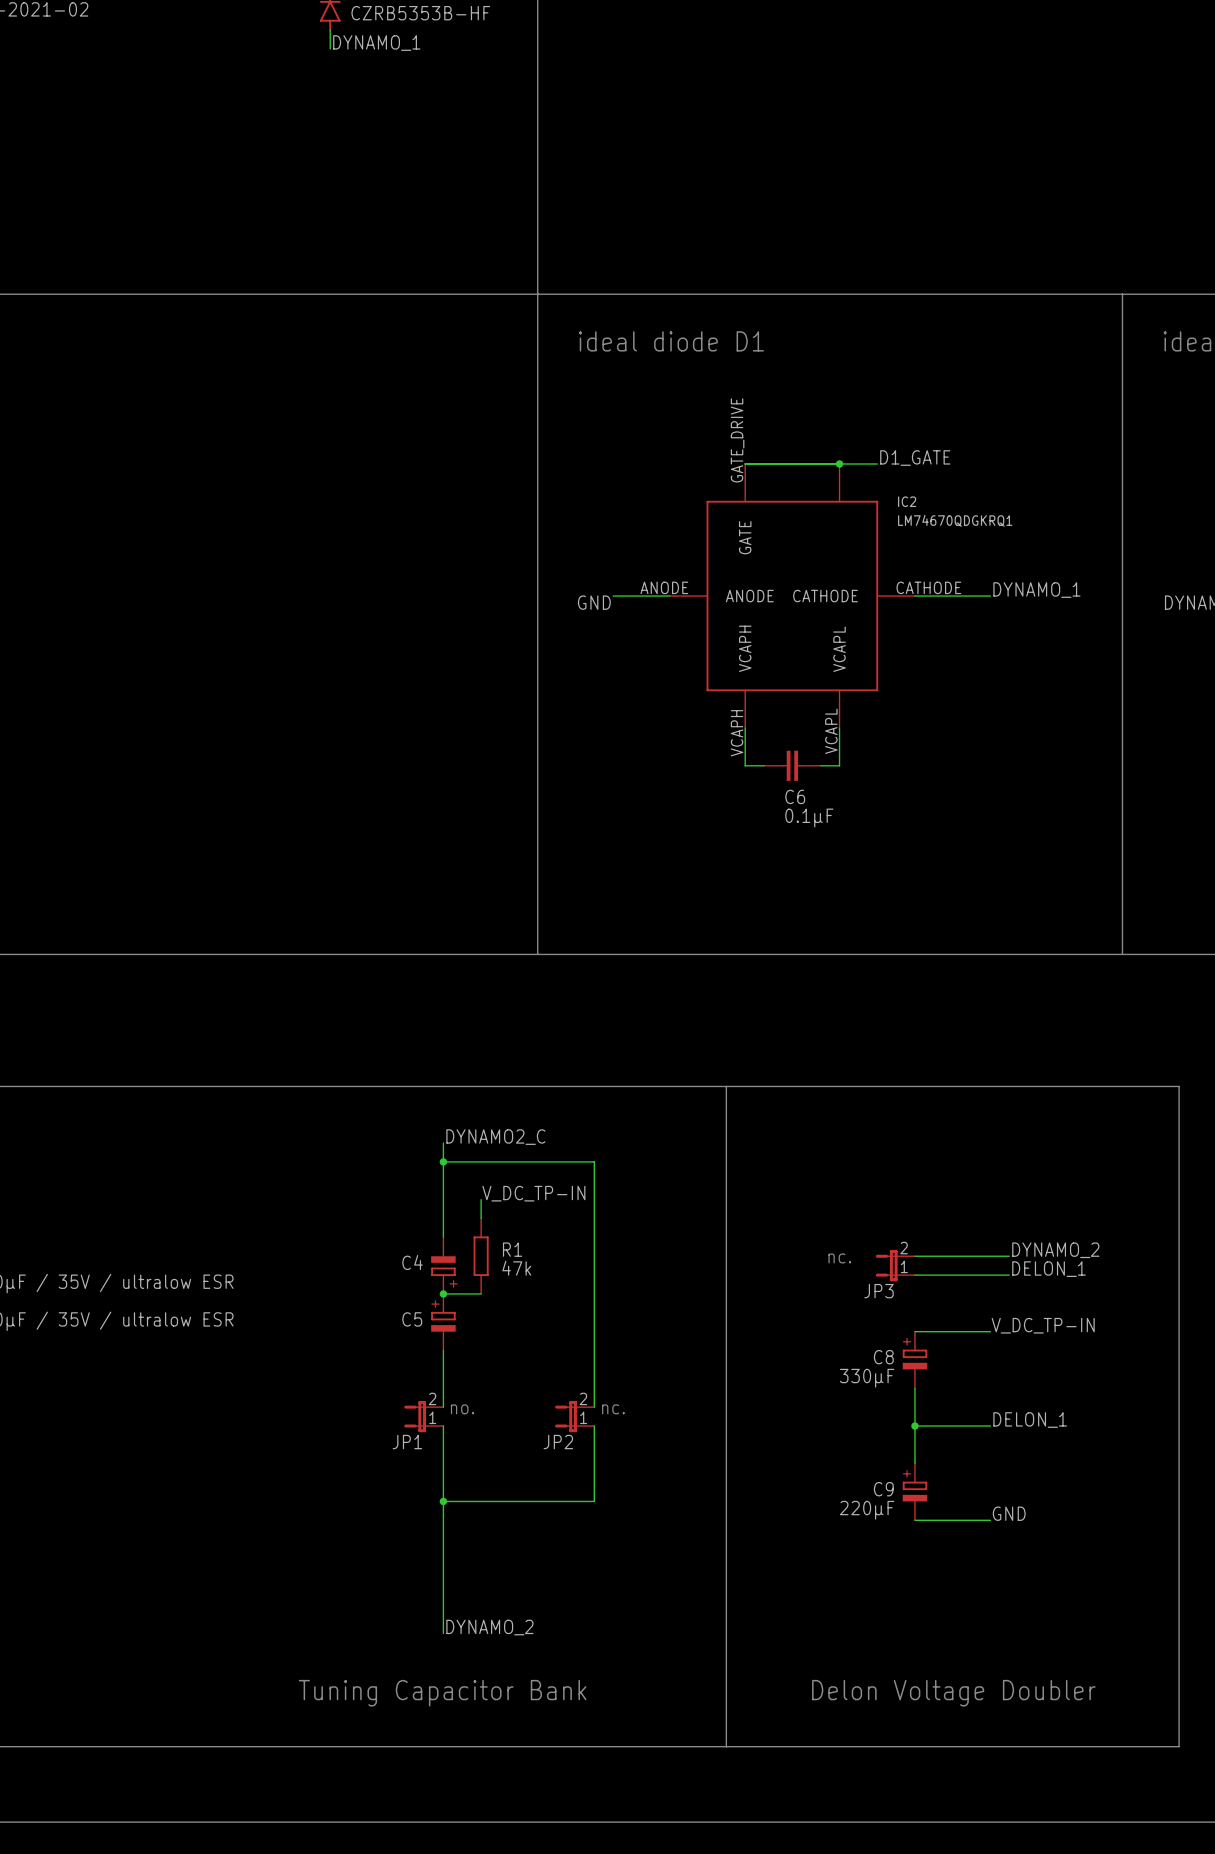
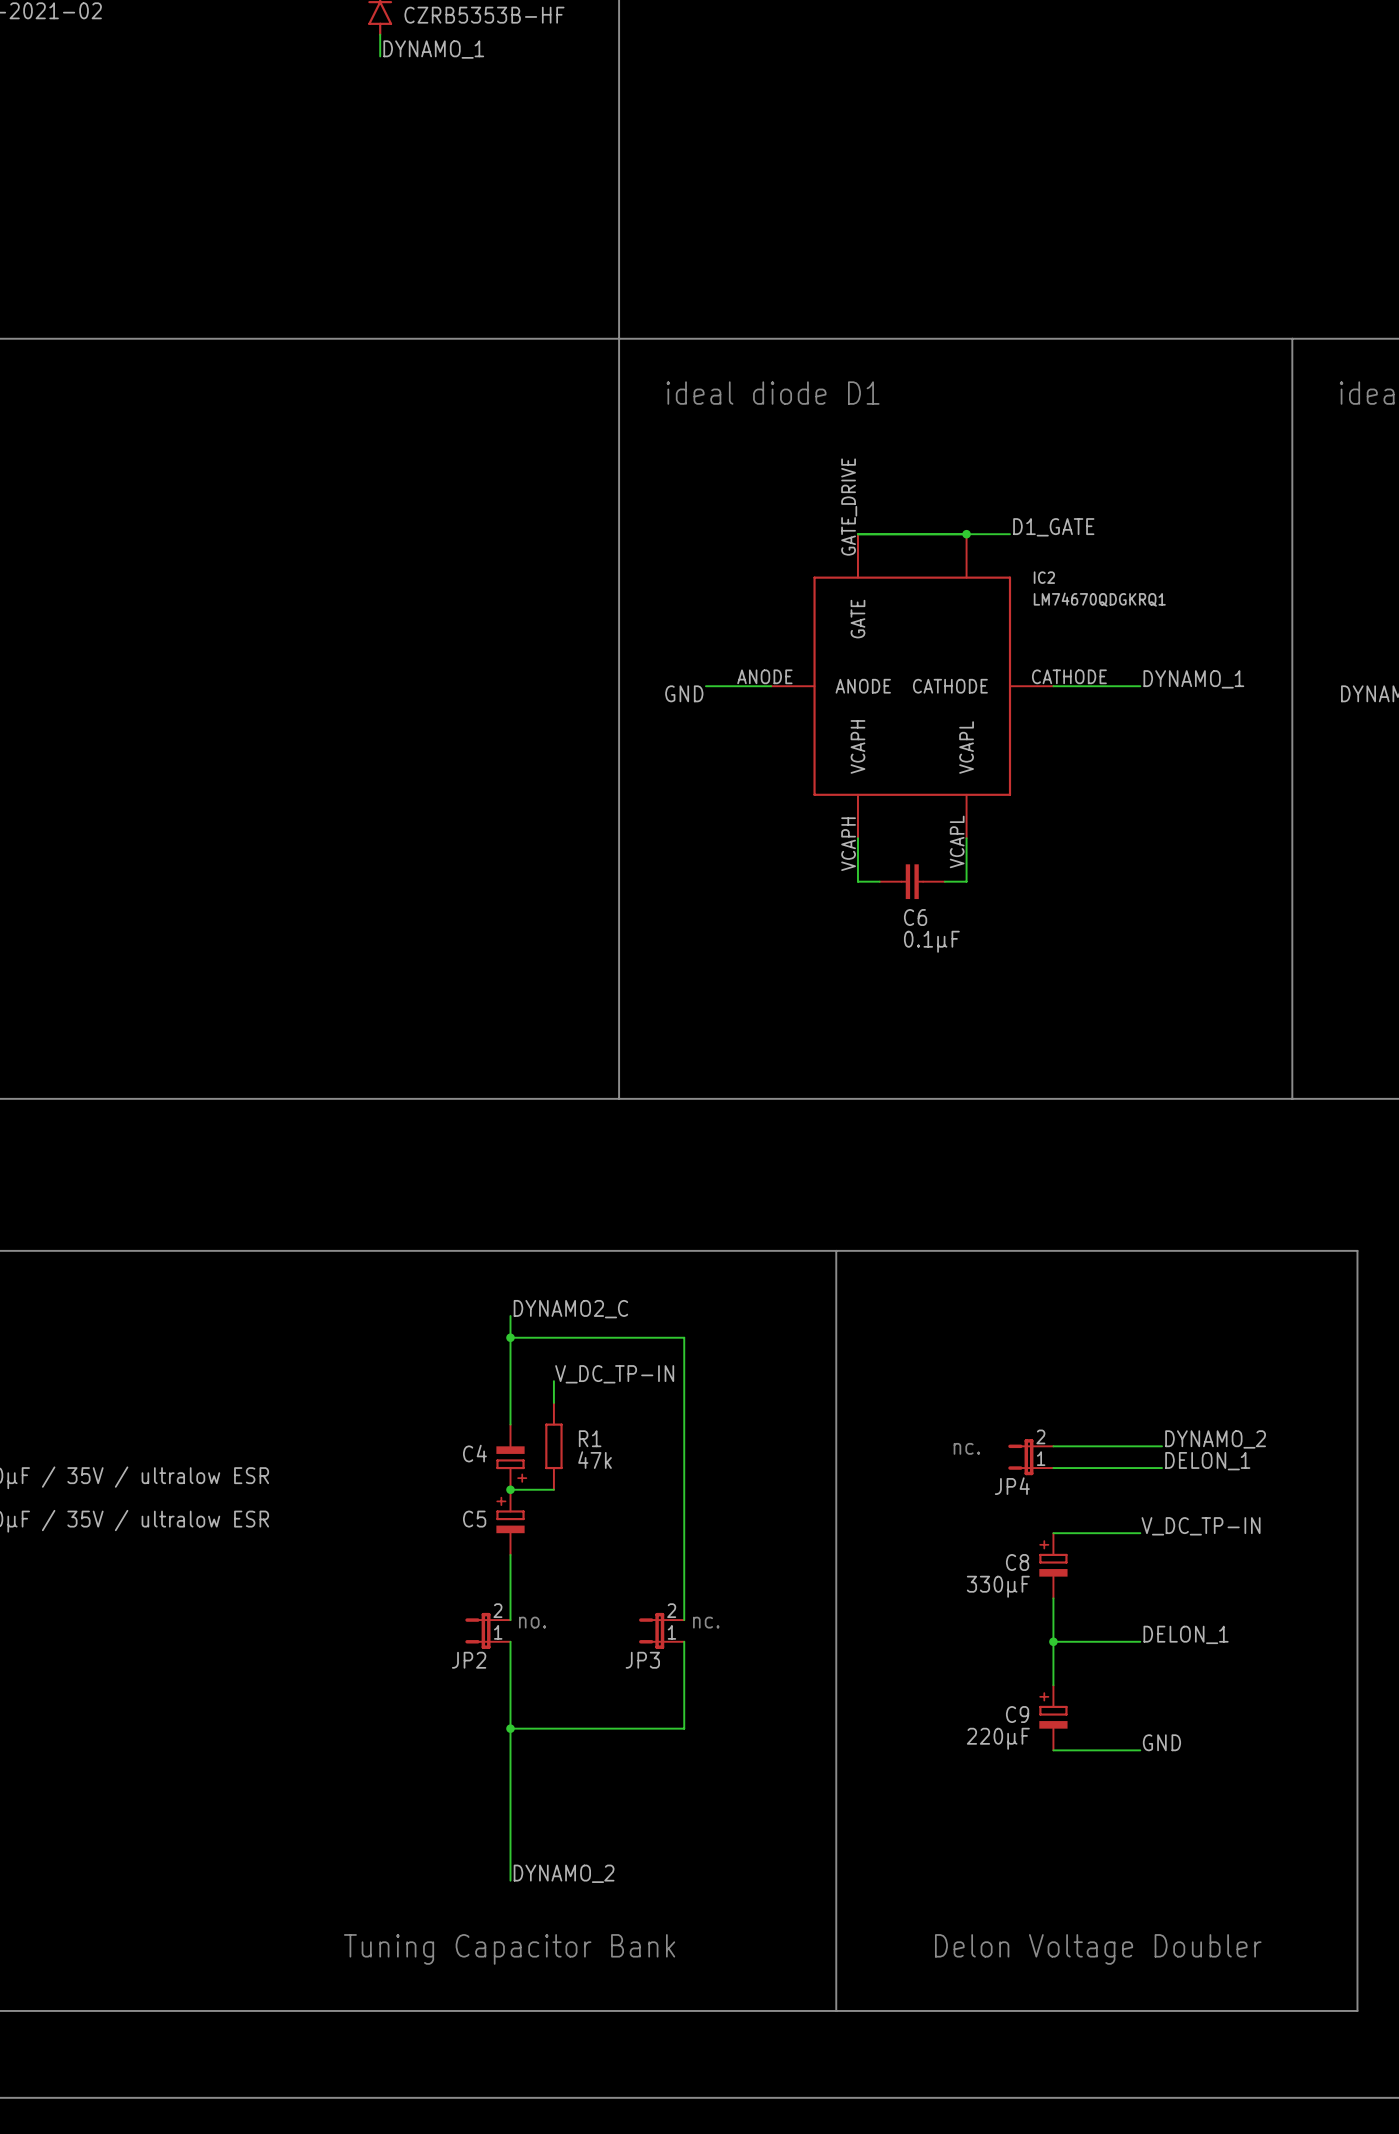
JP3 name: JP3 (879, 1291) -> JP4 (1012, 1486)
JP1 name: JP1 (407, 1442) -> JP2 (469, 1660)
JP2 name: JP2 (558, 1442) -> JP3 (642, 1660)

